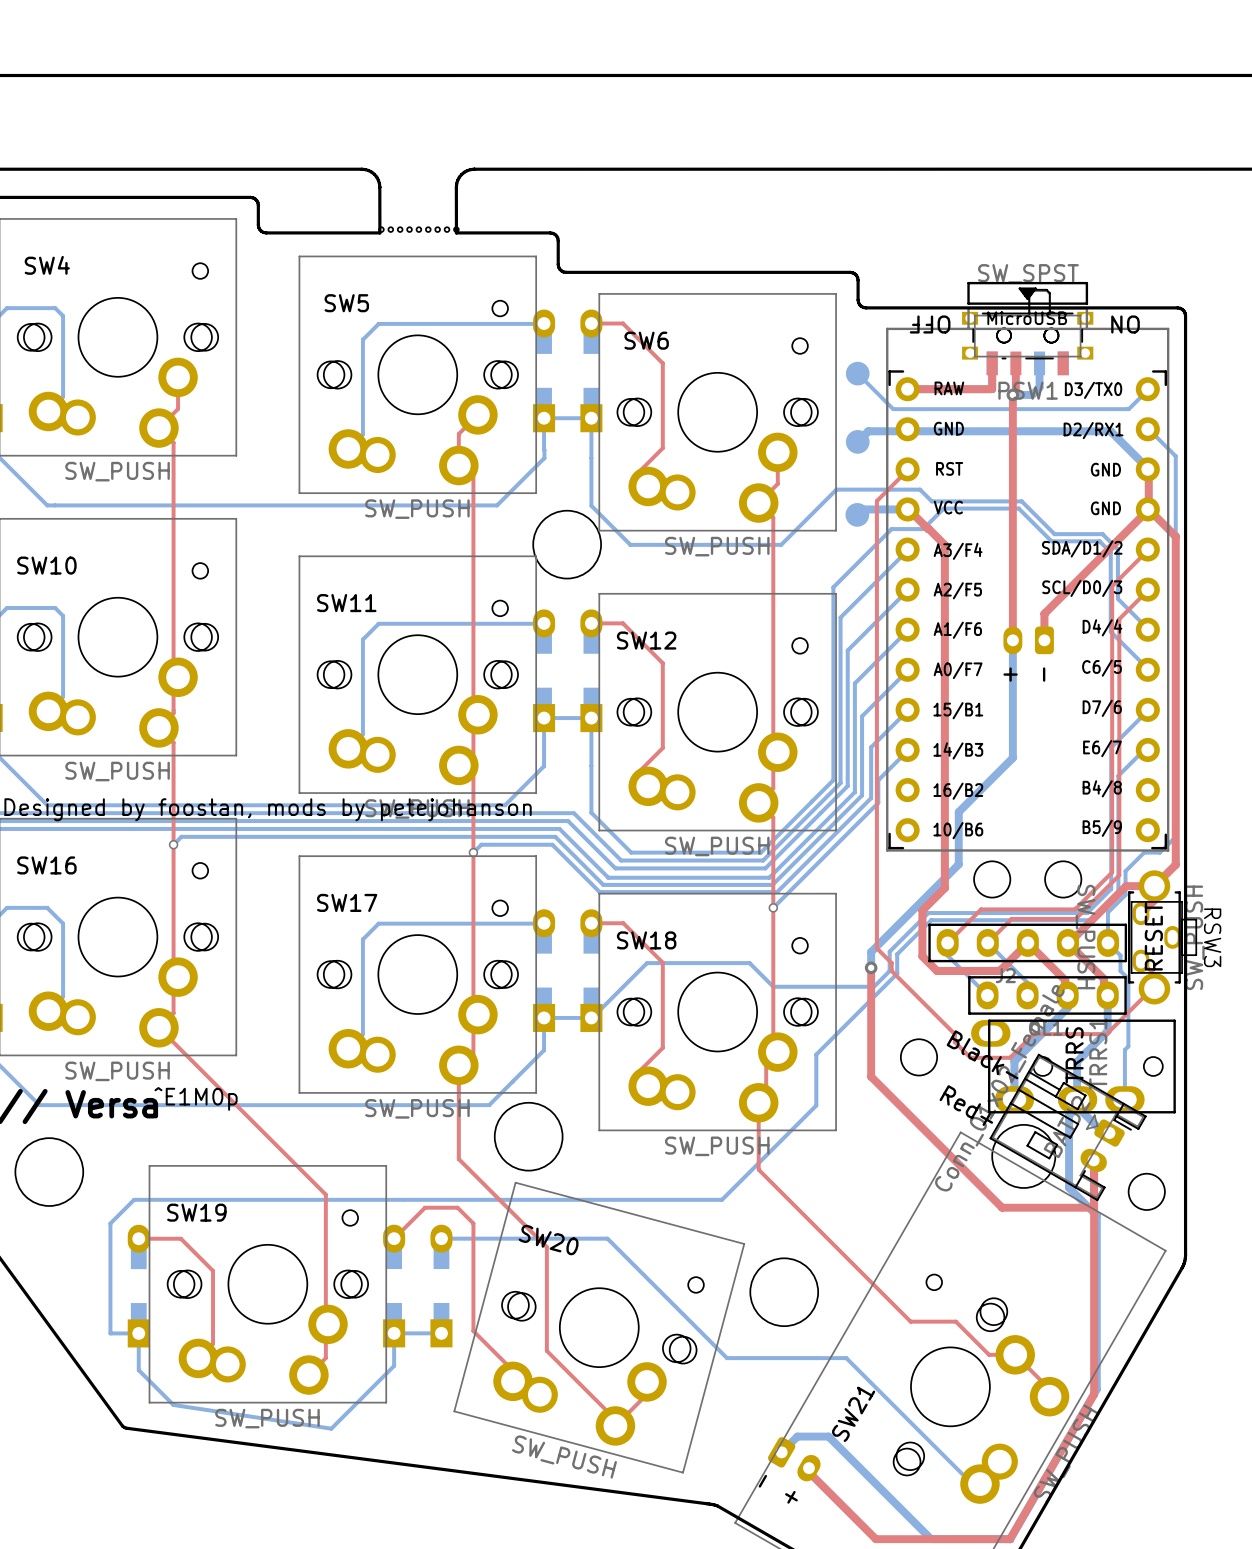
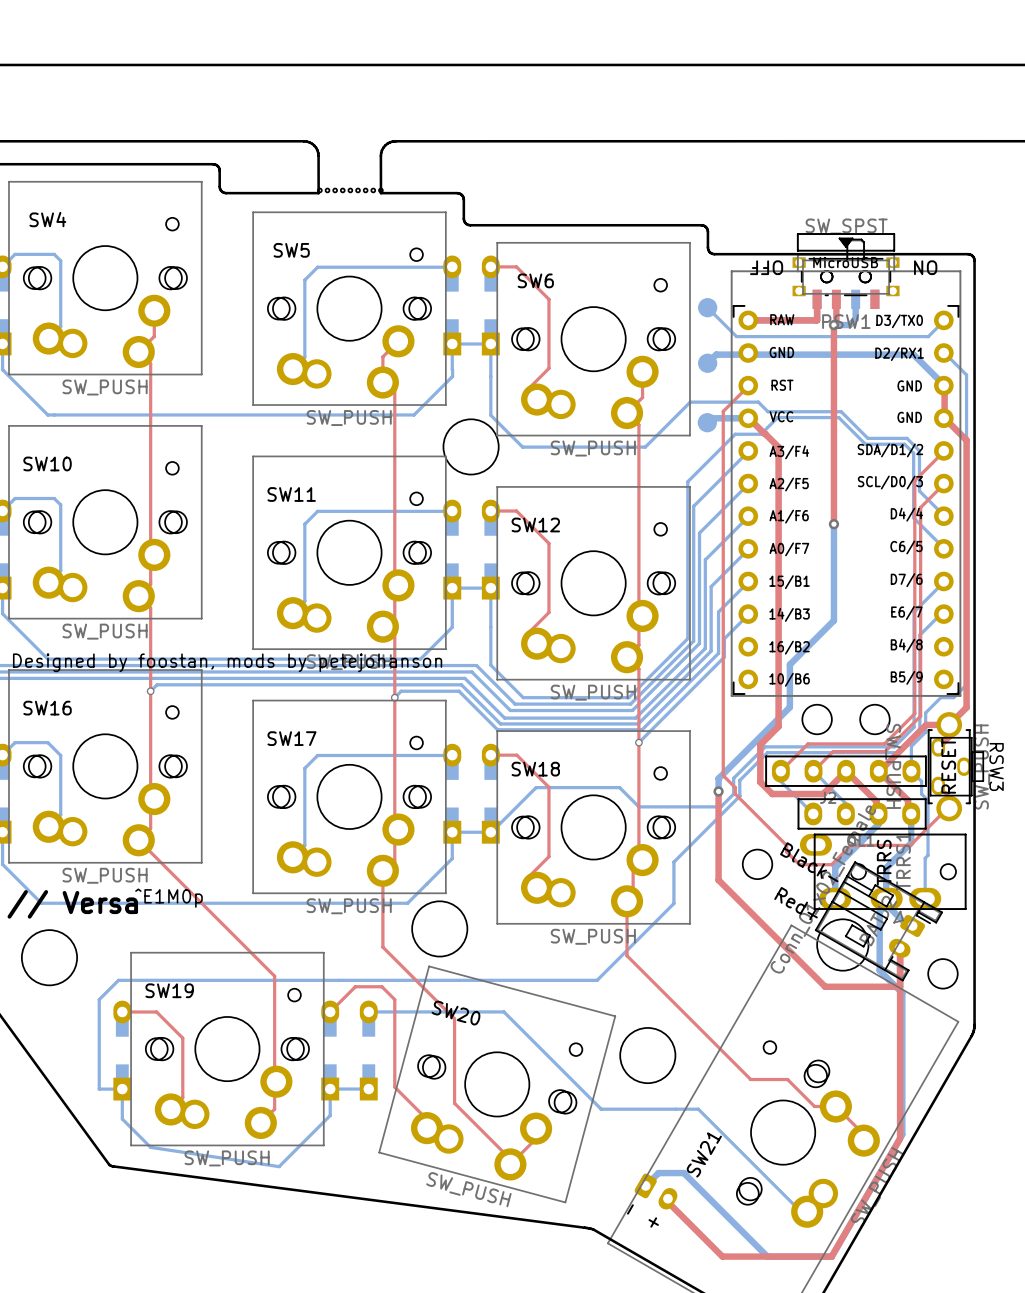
top track: (1148, 509) (1044, 613) (1044, 640) -> none
via: none -> (833, 524)
part: (1028, 640) -> none
text: + (1010, 674) -> none
text: - (1044, 674) -> none

